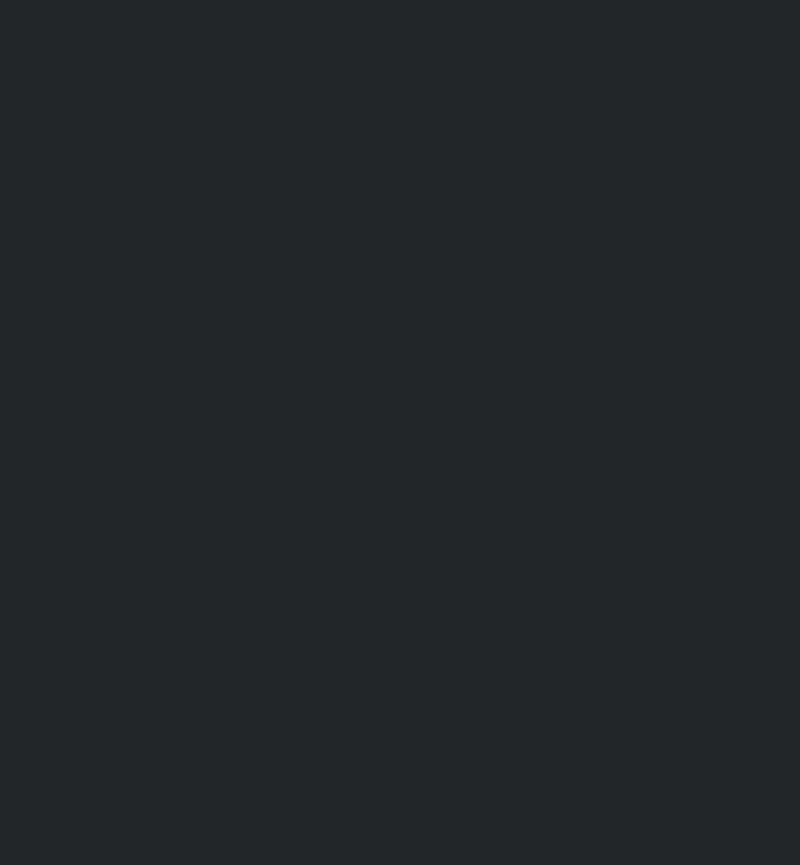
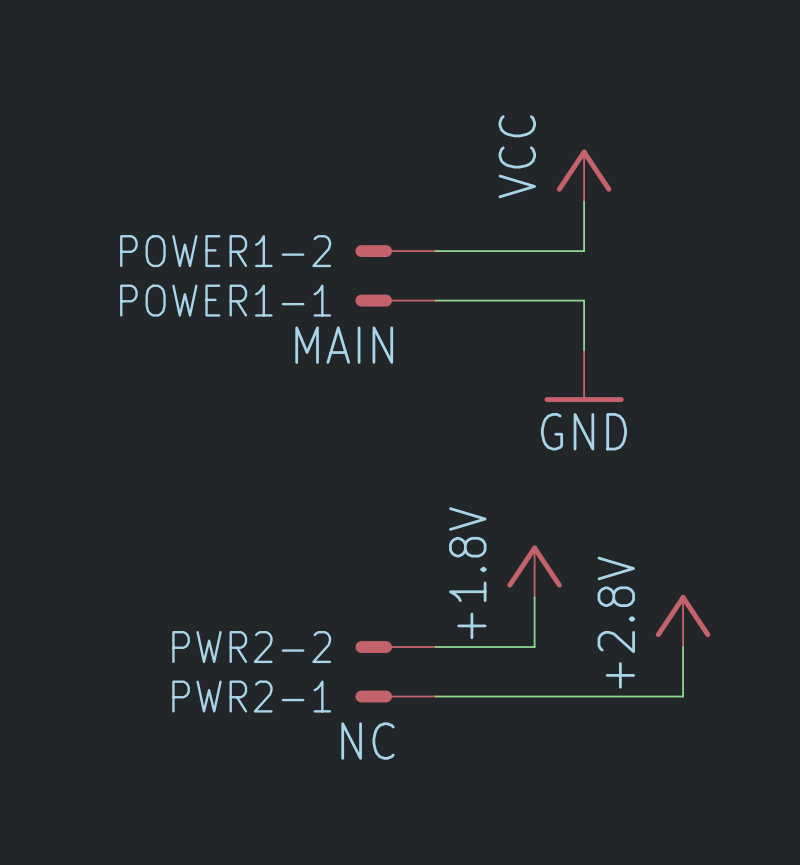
power symbol: none -> VCC (584, 175)
wire: none -> (584, 201) (584, 251) (435, 251)
POWER1-2: none -> (395, 251)
POWER1-1: none -> MAIN (395, 300)
wire: none -> (435, 300) (584, 300) (584, 350)
power symbol: none -> GND (584, 376)
power symbol: none -> +1.8V (534, 571)
wire: none -> (534, 597) (534, 647) (435, 647)
power symbol: none -> +2.8V (683, 621)
PWR2-2: none -> (395, 647)
wire: none -> (683, 647) (683, 696) (435, 696)
PWR2-1: none -> NC (395, 696)

